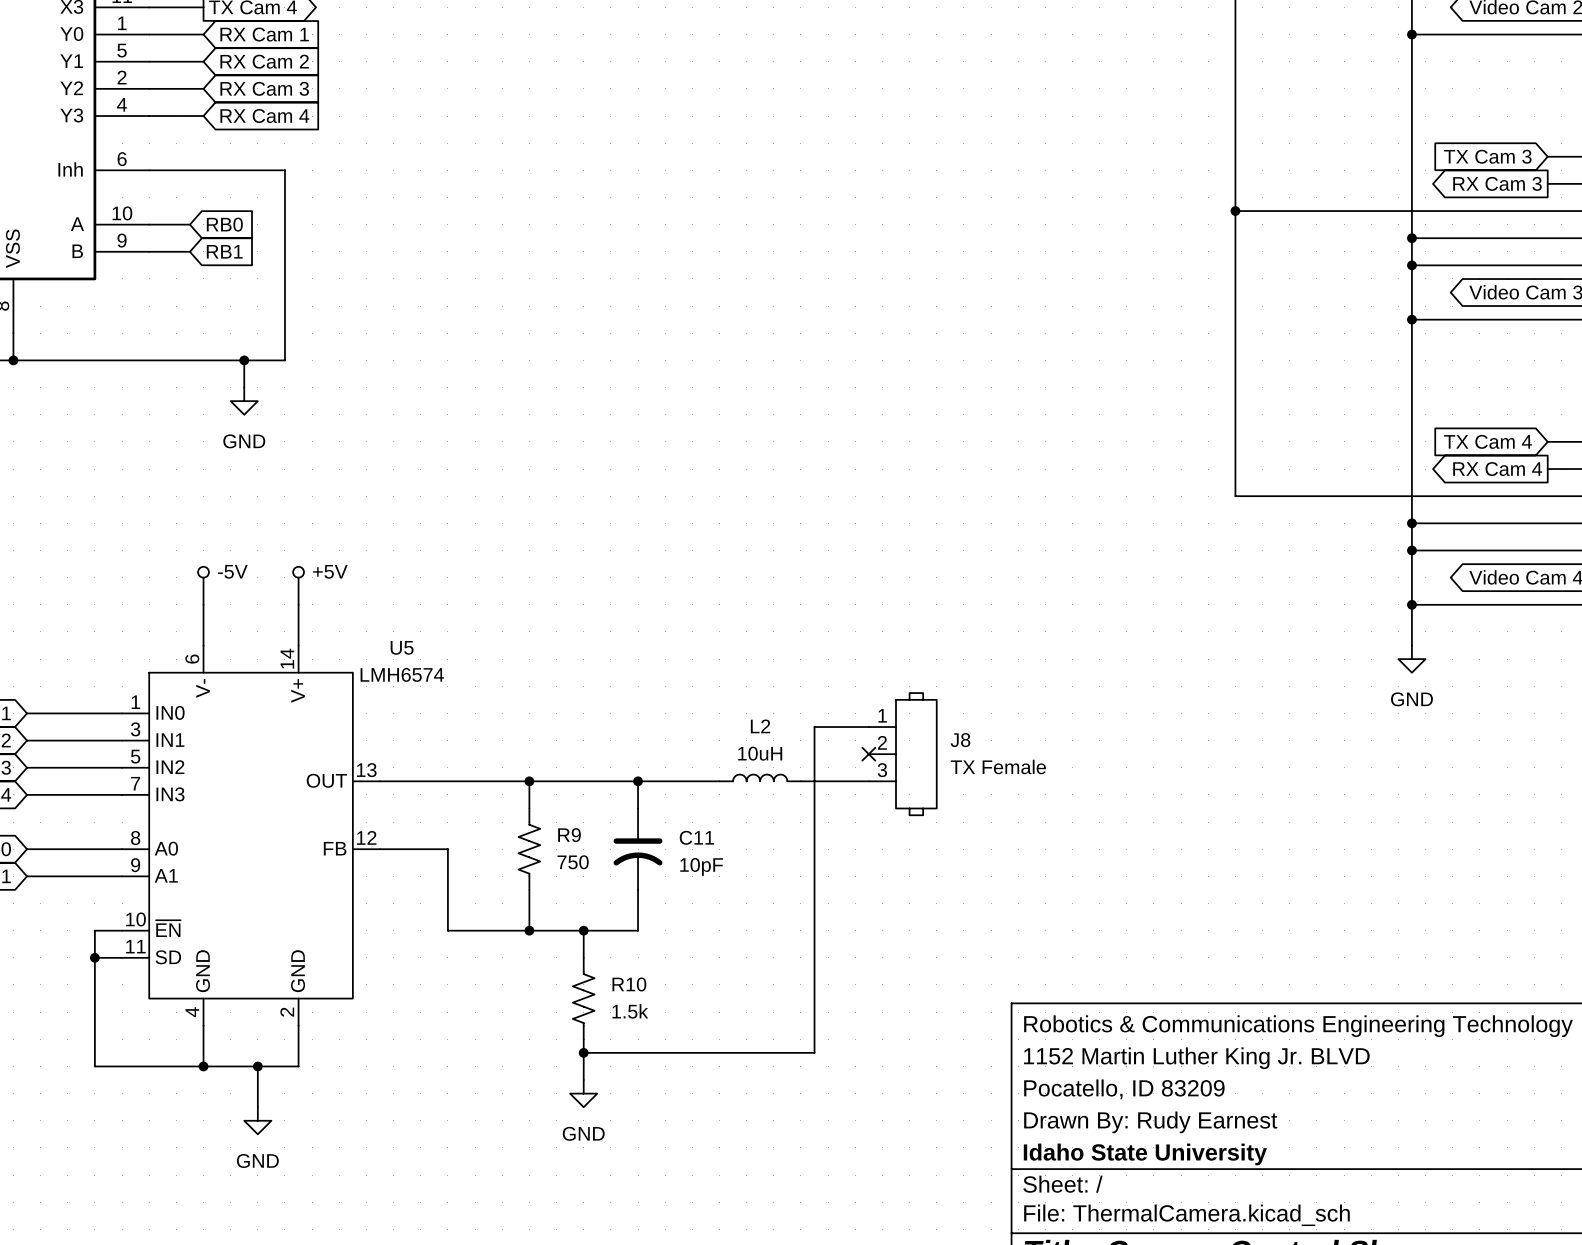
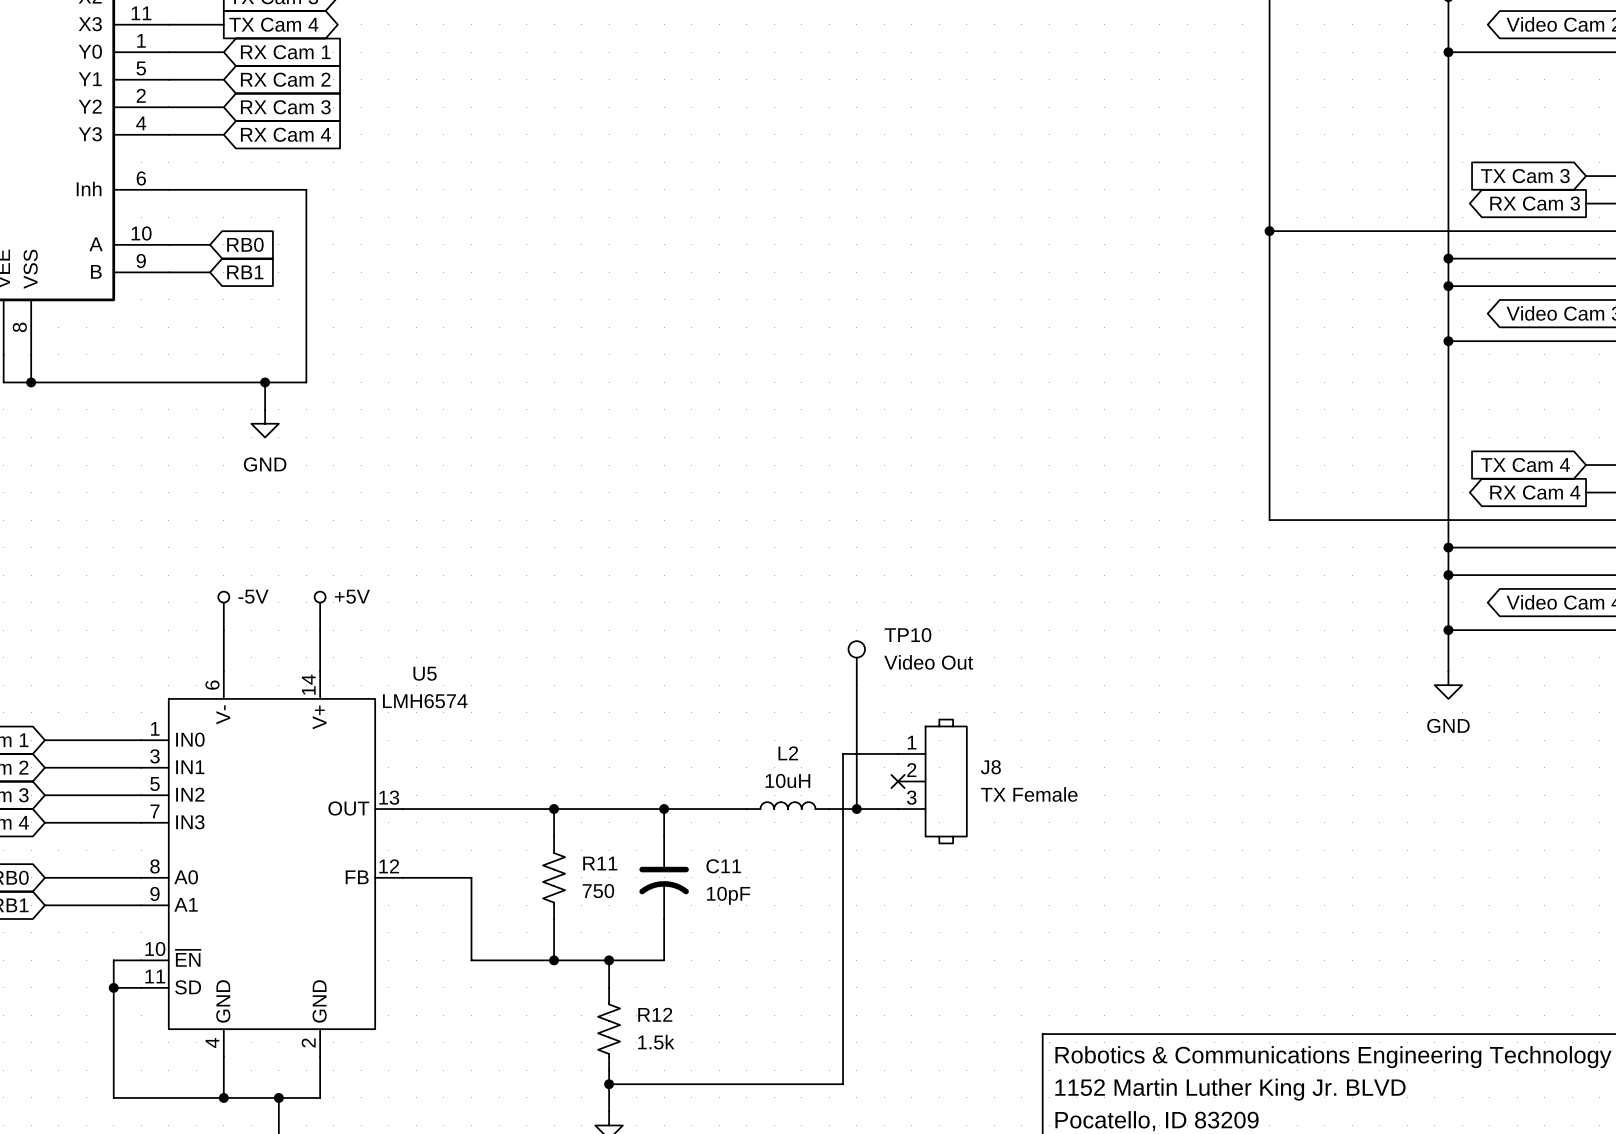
TP10: none -> Video Out (856, 663)
wire: none -> (856, 685) (856, 809)
junction: none -> (856, 809)
R9 name: R9 (569, 835) -> R11 (600, 863)
R10 name: R10 (629, 984) -> R12 (655, 1014)

